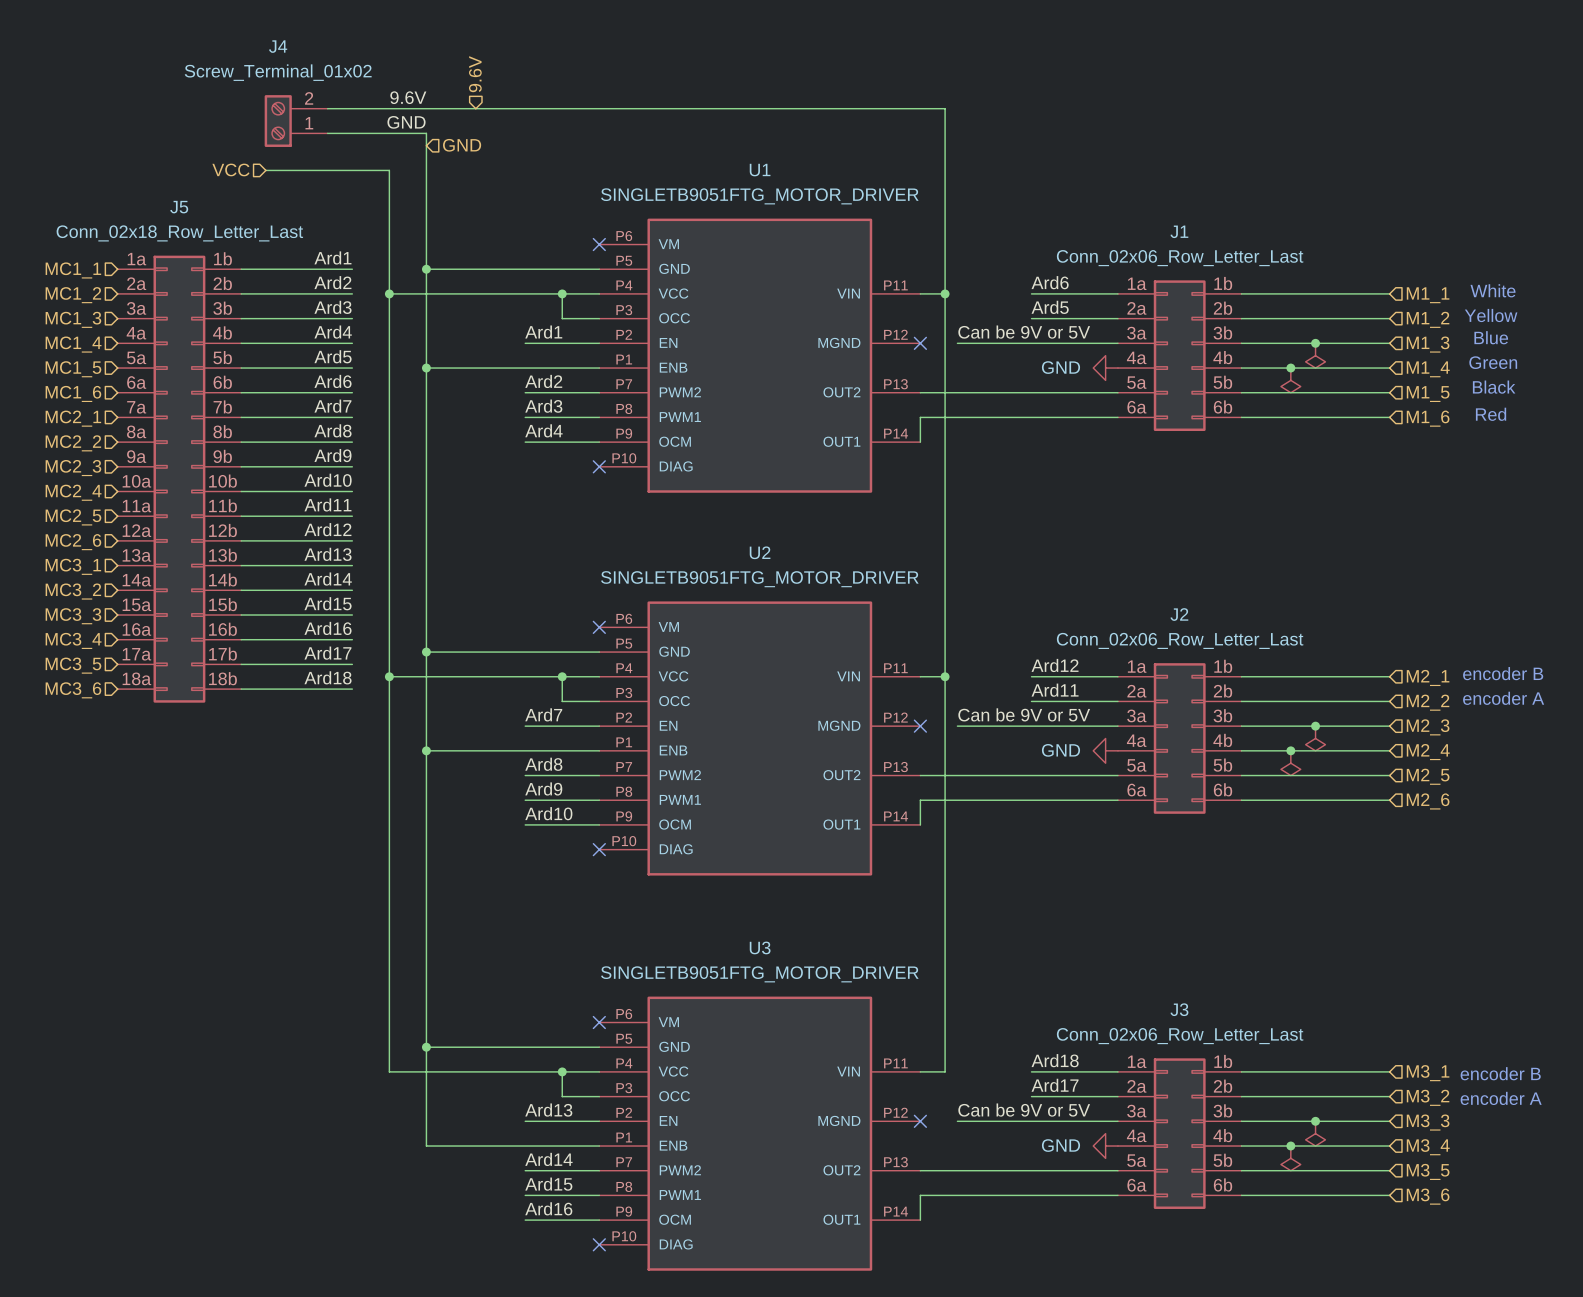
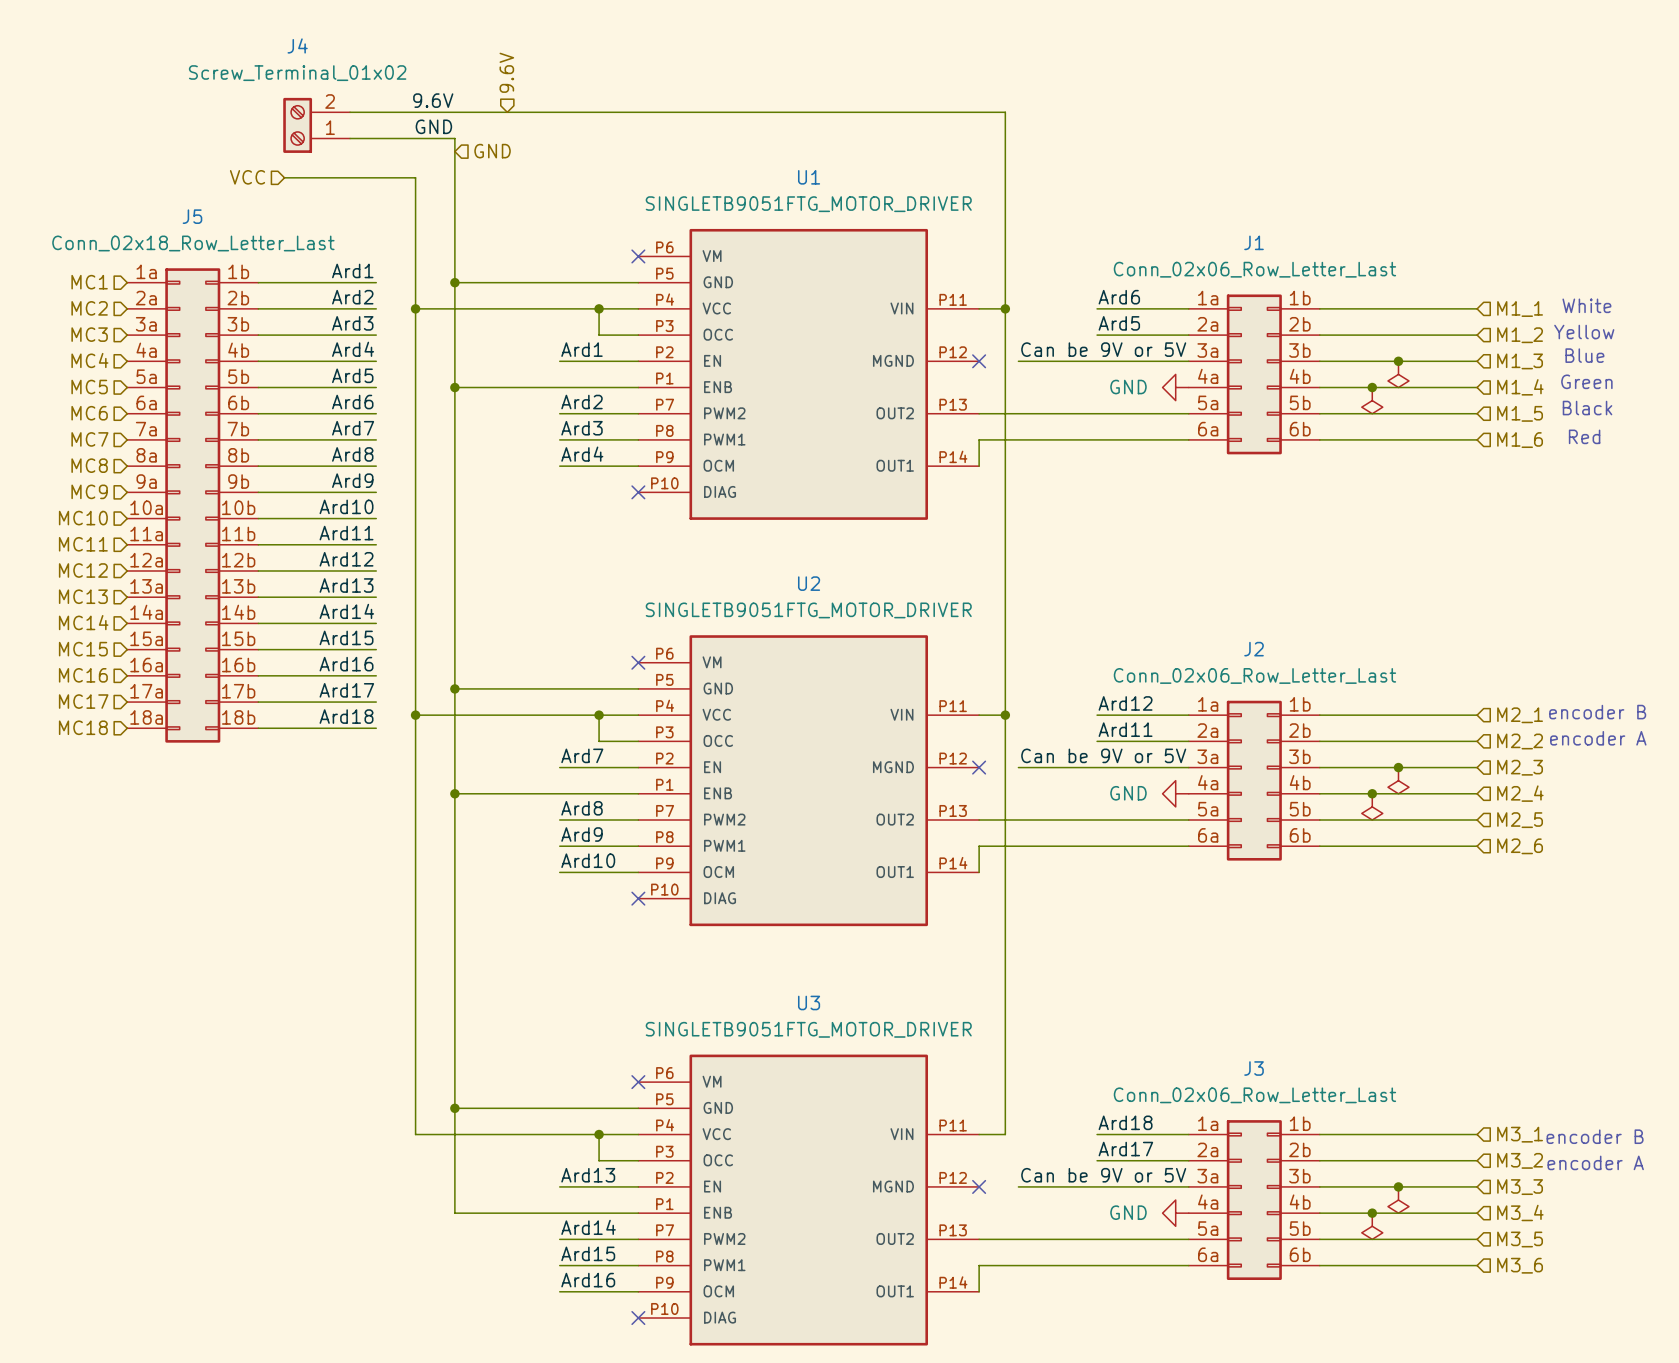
hierarchical label: MC1_1 (73, 270) -> MC1 (89, 282)
hierarchical label: MC1_2 (73, 295) -> MC2 (89, 308)
hierarchical label: MC1_3 (73, 319) -> MC3 (89, 334)
hierarchical label: MC1_4 (73, 344) -> MC4 (89, 360)
hierarchical label: MC1_5 (73, 369) -> MC5 (89, 387)
hierarchical label: MC1_6 (73, 393) -> MC6 (89, 413)
hierarchical label: MC2_1 (73, 418) -> MC7 (89, 439)
hierarchical label: MC2_2 (73, 443) -> MC8 (89, 465)
hierarchical label: MC2_3 (73, 468) -> MC9 (89, 491)
hierarchical label: MC2_4 (73, 492) -> MC10 (83, 518)
hierarchical label: MC2_5 (73, 517) -> MC11 (83, 544)
hierarchical label: MC2_6 (73, 542) -> MC12 (83, 570)
hierarchical label: MC3_1 (73, 566) -> MC13 (83, 596)
hierarchical label: MC3_2 (73, 591) -> MC14 (83, 622)
hierarchical label: MC3_3 (73, 616) -> MC15 (83, 649)
hierarchical label: MC3_4 (73, 640) -> MC16 (83, 675)
hierarchical label: MC3_5 (73, 665) -> MC17 (83, 701)
hierarchical label: MC3_6 (73, 690) -> MC18 (83, 727)

